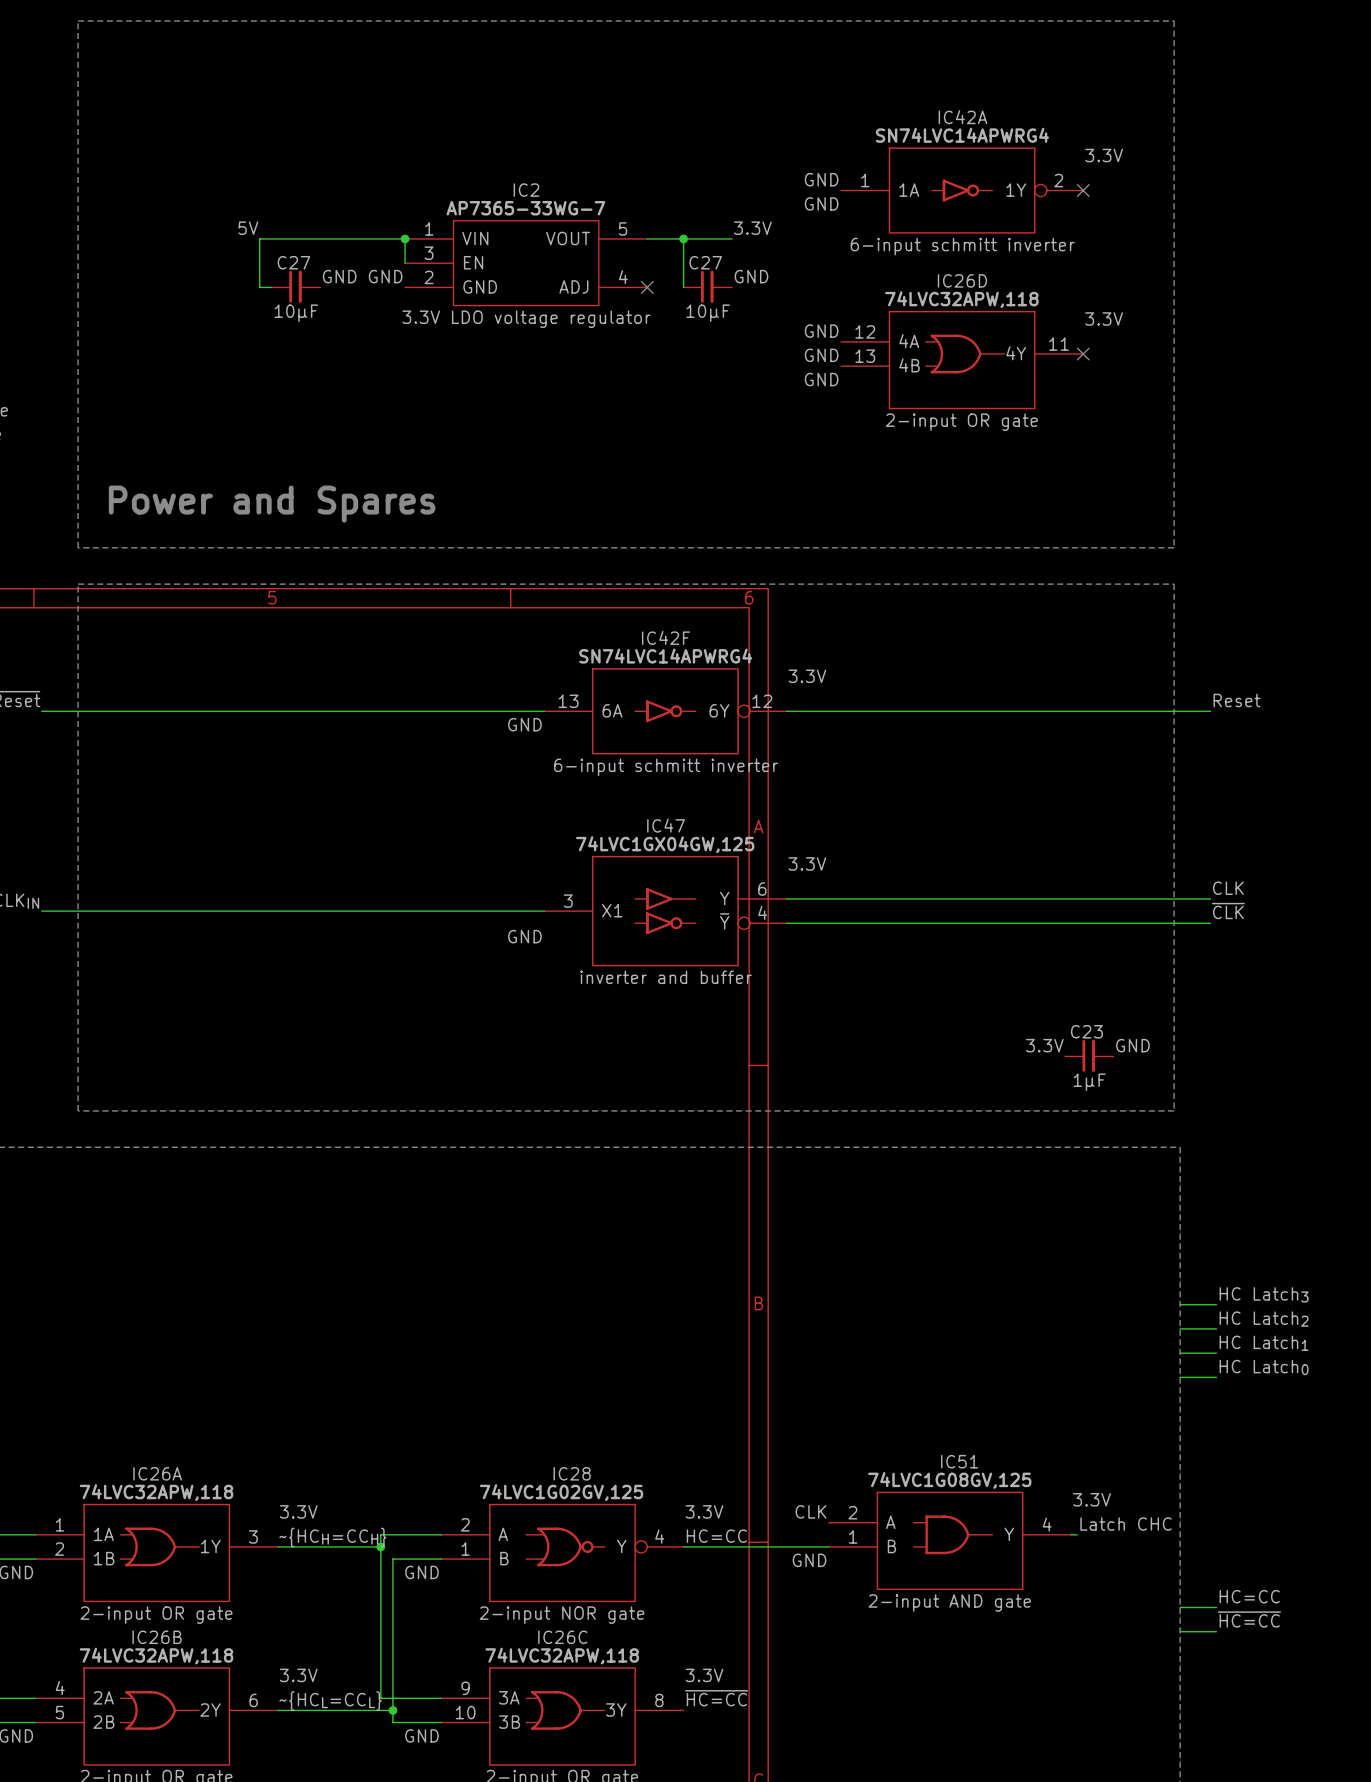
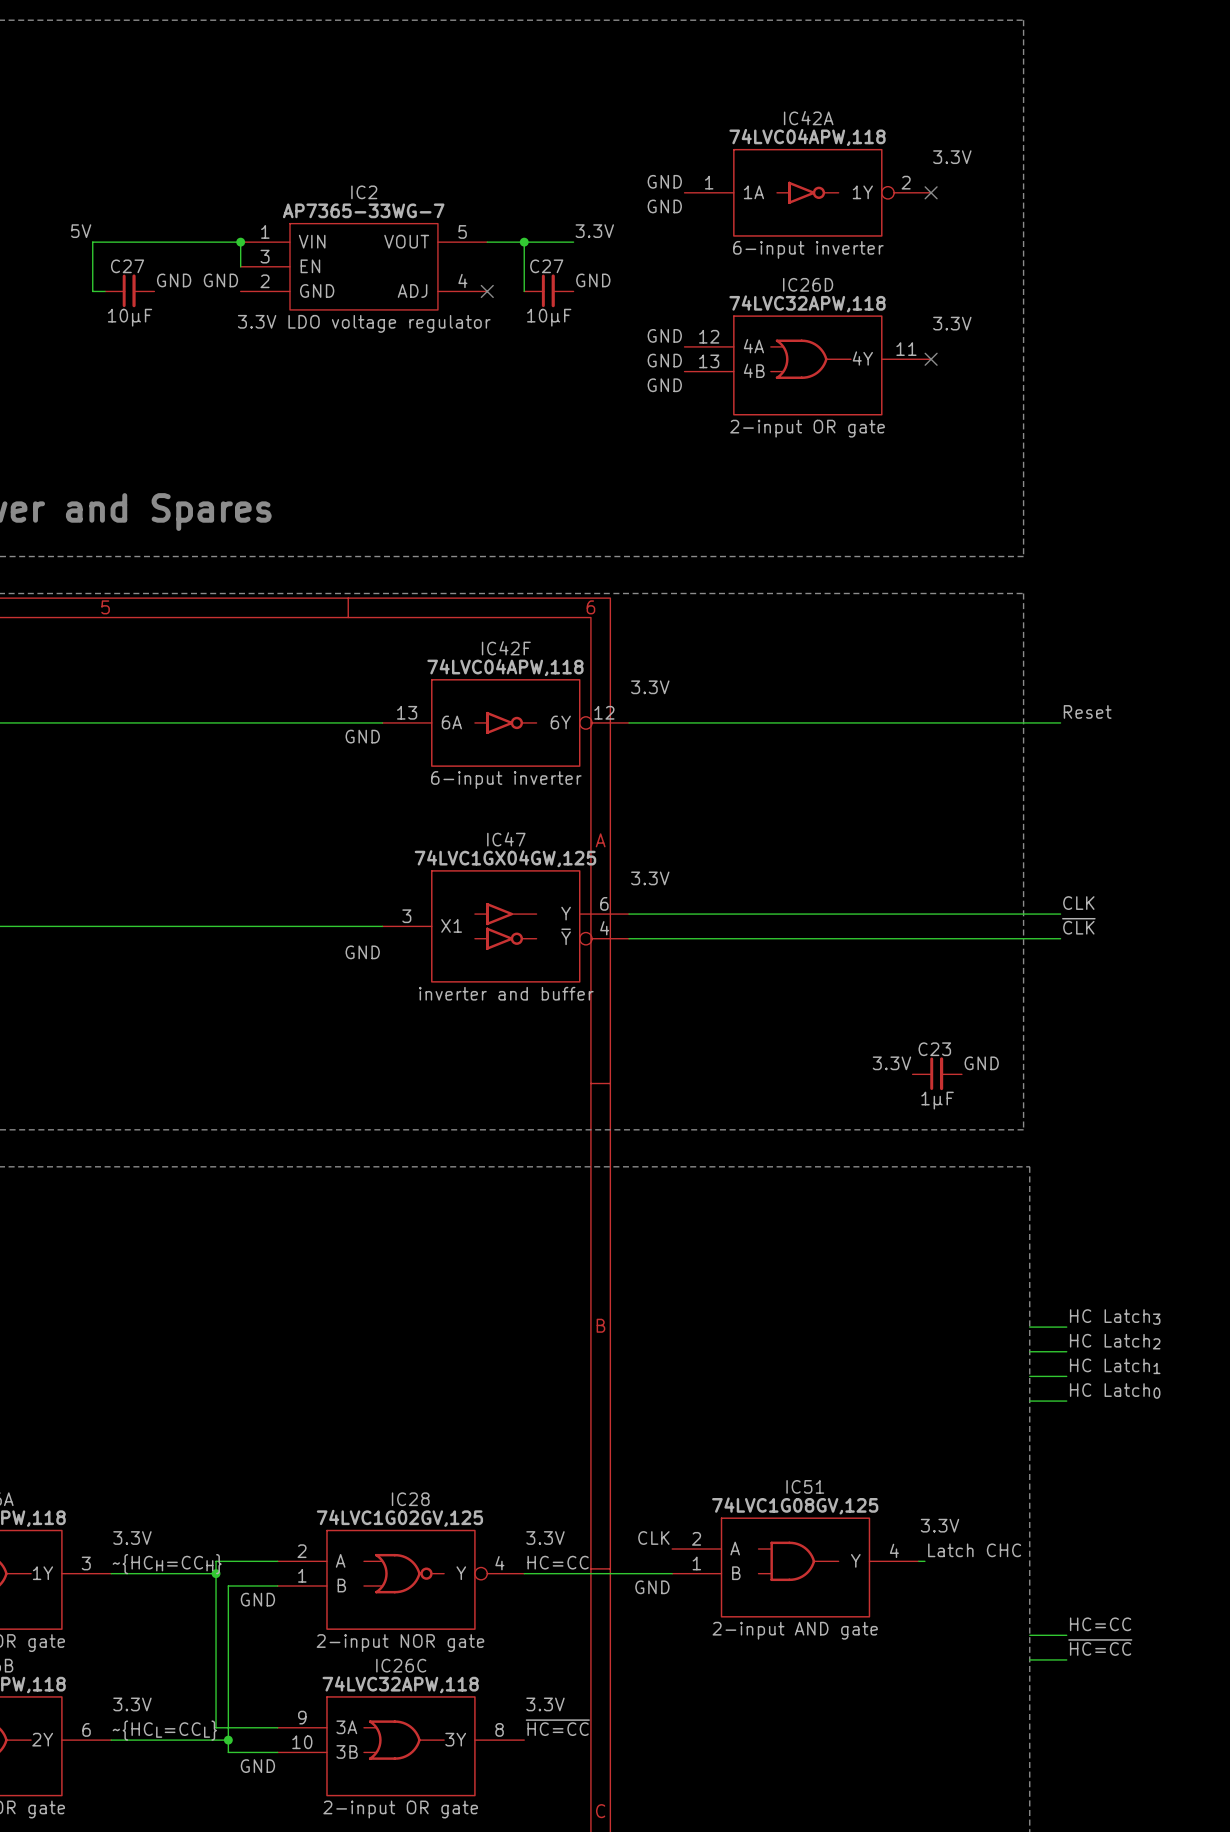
IC42A value: SN74LVC14APWRG4 (962, 135) -> 74LVC04APW,118 (807, 137)
IC42A text: 6-input schmitt inverter (962, 246) -> 6-input inverter (808, 249)
IC42F value: SN74LVC14APWRG4 (665, 656) -> 74LVC04APW,118 (505, 667)
IC42F text: 6-input schmitt inverter (666, 767) -> 6-input inverter (506, 780)

